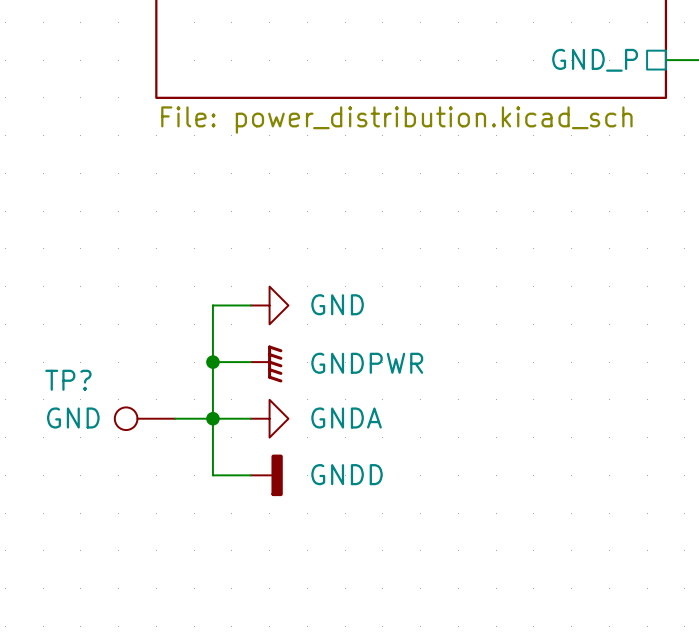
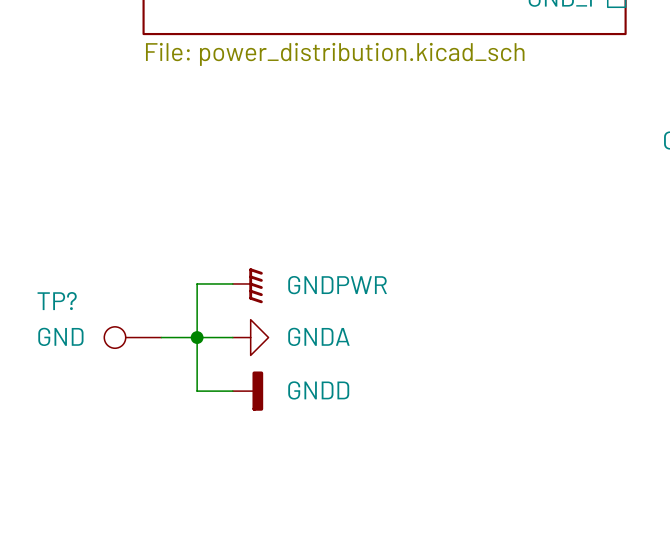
wire: (250, 305) (212, 305) (212, 362) -> none
power symbol: GND (269, 305) -> none
junction: (212, 362) -> none

